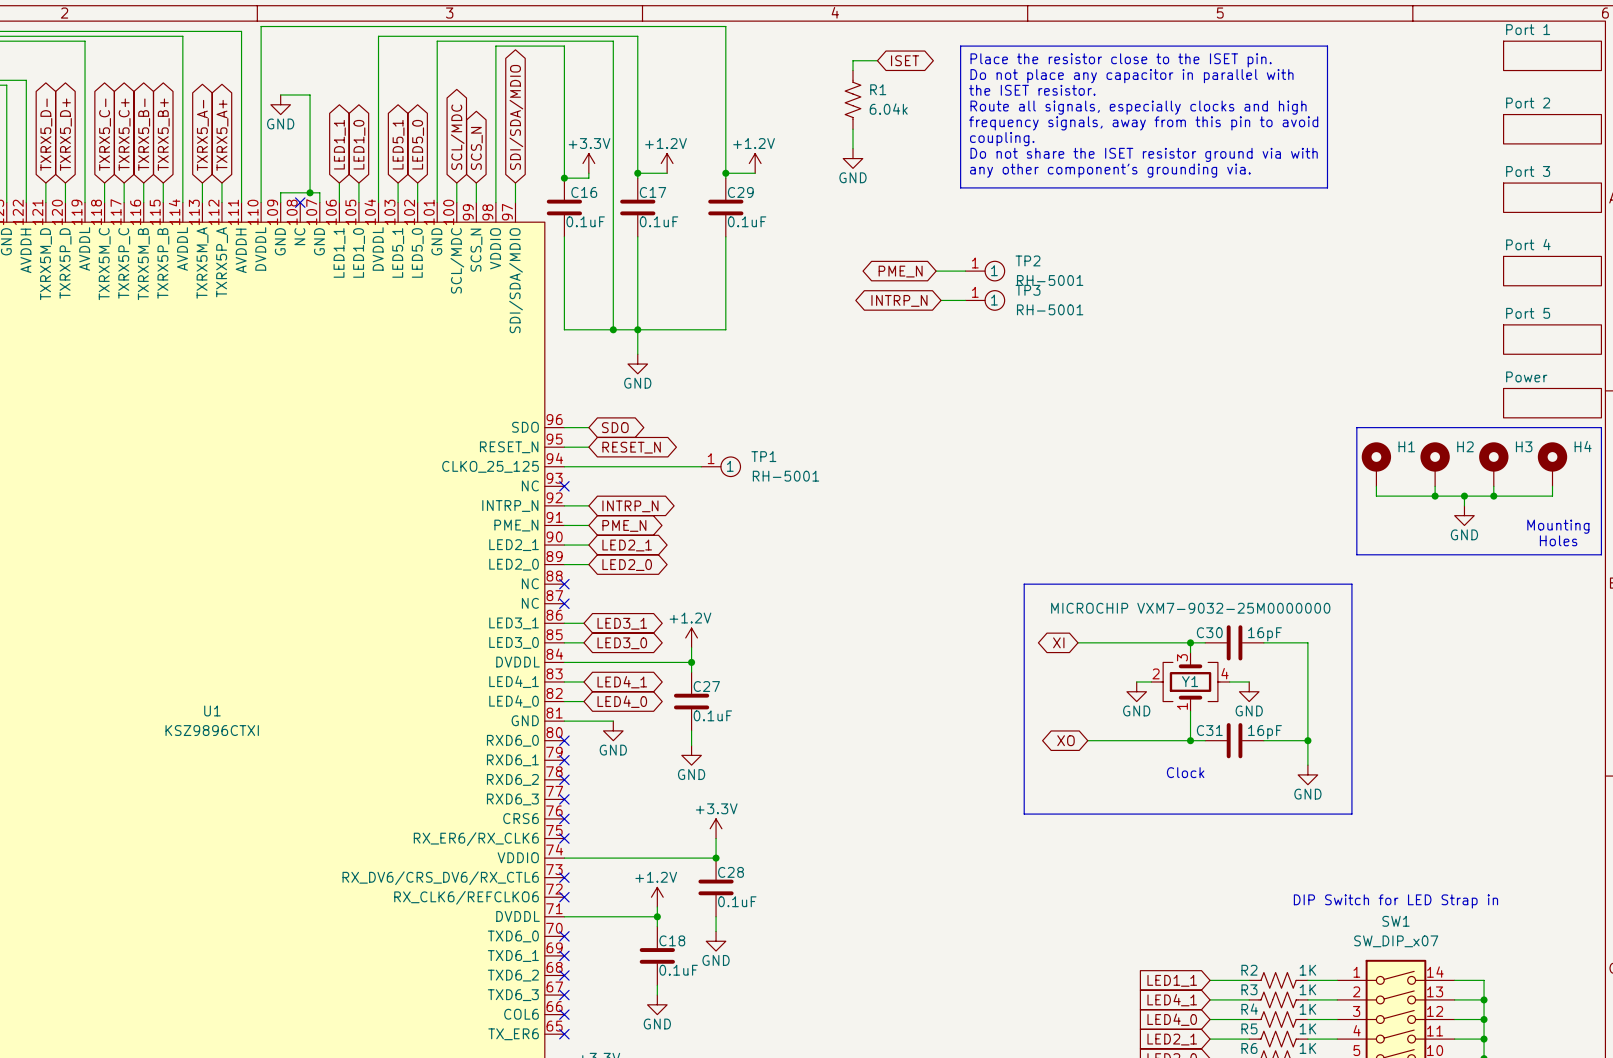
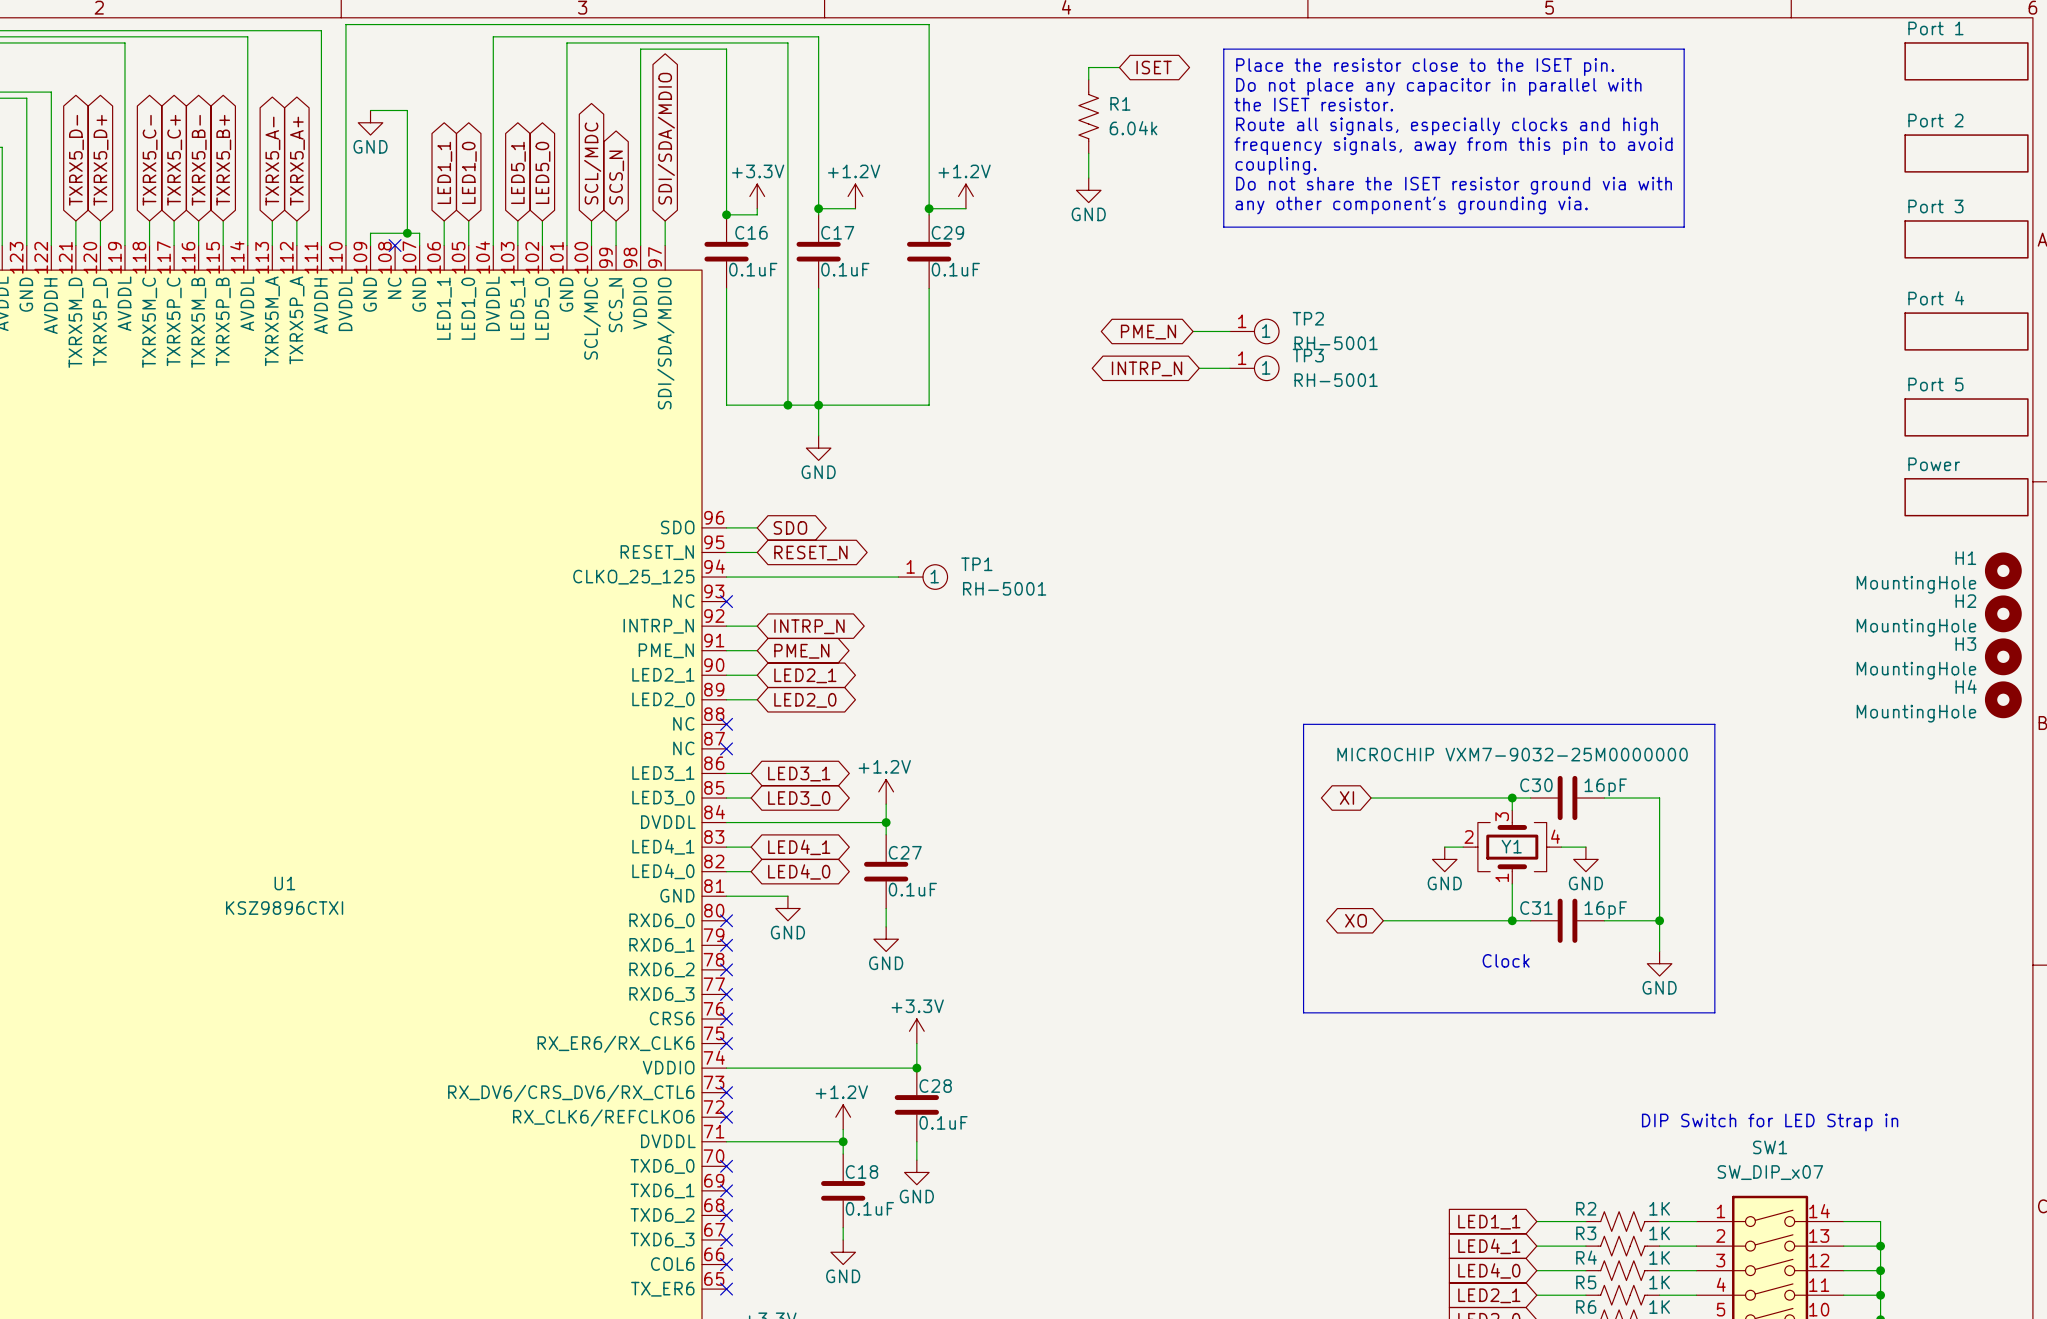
line: (1356, 427) (1601, 427) (1601, 554) (1356, 554) (1356, 427) -> none
H1 symbol: [1361, 442, 1392, 487] -> [1984, 552, 2022, 590]
H2 symbol: [1420, 442, 1450, 487] -> [1984, 595, 2022, 633]
H3 symbol: [1479, 442, 1509, 487] -> [1984, 638, 2022, 676]
H4 symbol: [1537, 442, 1568, 487] -> [1984, 681, 2022, 719]
H1 name position: H1 (1406, 446) -> H1 (1965, 558)
H2 name position: H2 (1465, 446) -> H2 (1965, 601)
H3 name position: H3 (1524, 446) -> H3 (1965, 644)
H4 name position: H4 (1583, 446) -> H4 (1966, 686)
H1 value: none -> MountingHole (1916, 584)
wire: (1376, 486) (1376, 496) (1552, 496) (1552, 486) -> none
wire: (1435, 486) (1435, 496) -> none
wire: (1493, 486) (1493, 496) -> none
junction: (1435, 496) -> none
wire: (1464, 496) (1464, 505) -> none
junction: (1464, 496) -> none
junction: (1493, 496) -> none
H2 value: none -> MountingHole (1916, 627)
power symbol: GND (1464, 515) -> none
text: Mounting (1558, 526) -> none
text: Holes (1558, 540) -> none
H3 value: none -> MountingHole (1916, 670)
H4 value: none -> MountingHole (1916, 713)

